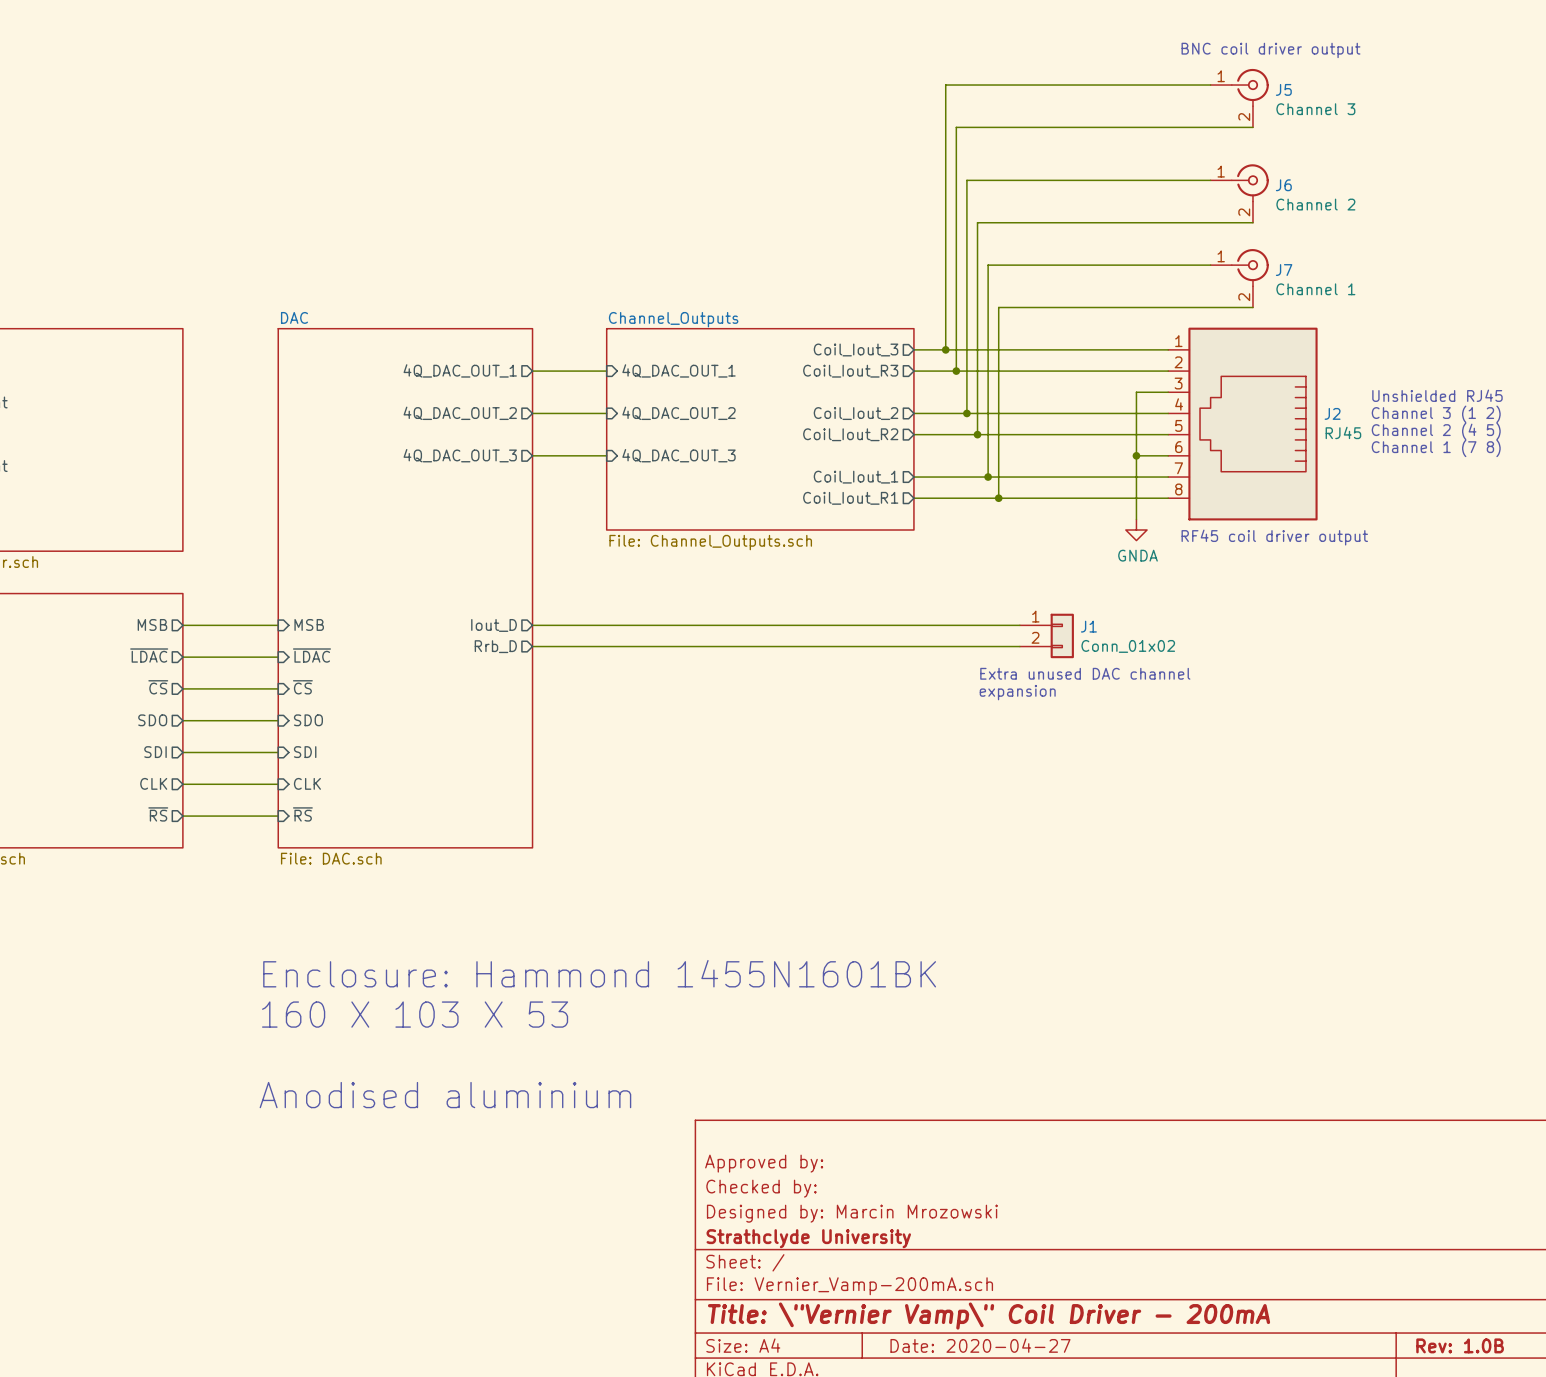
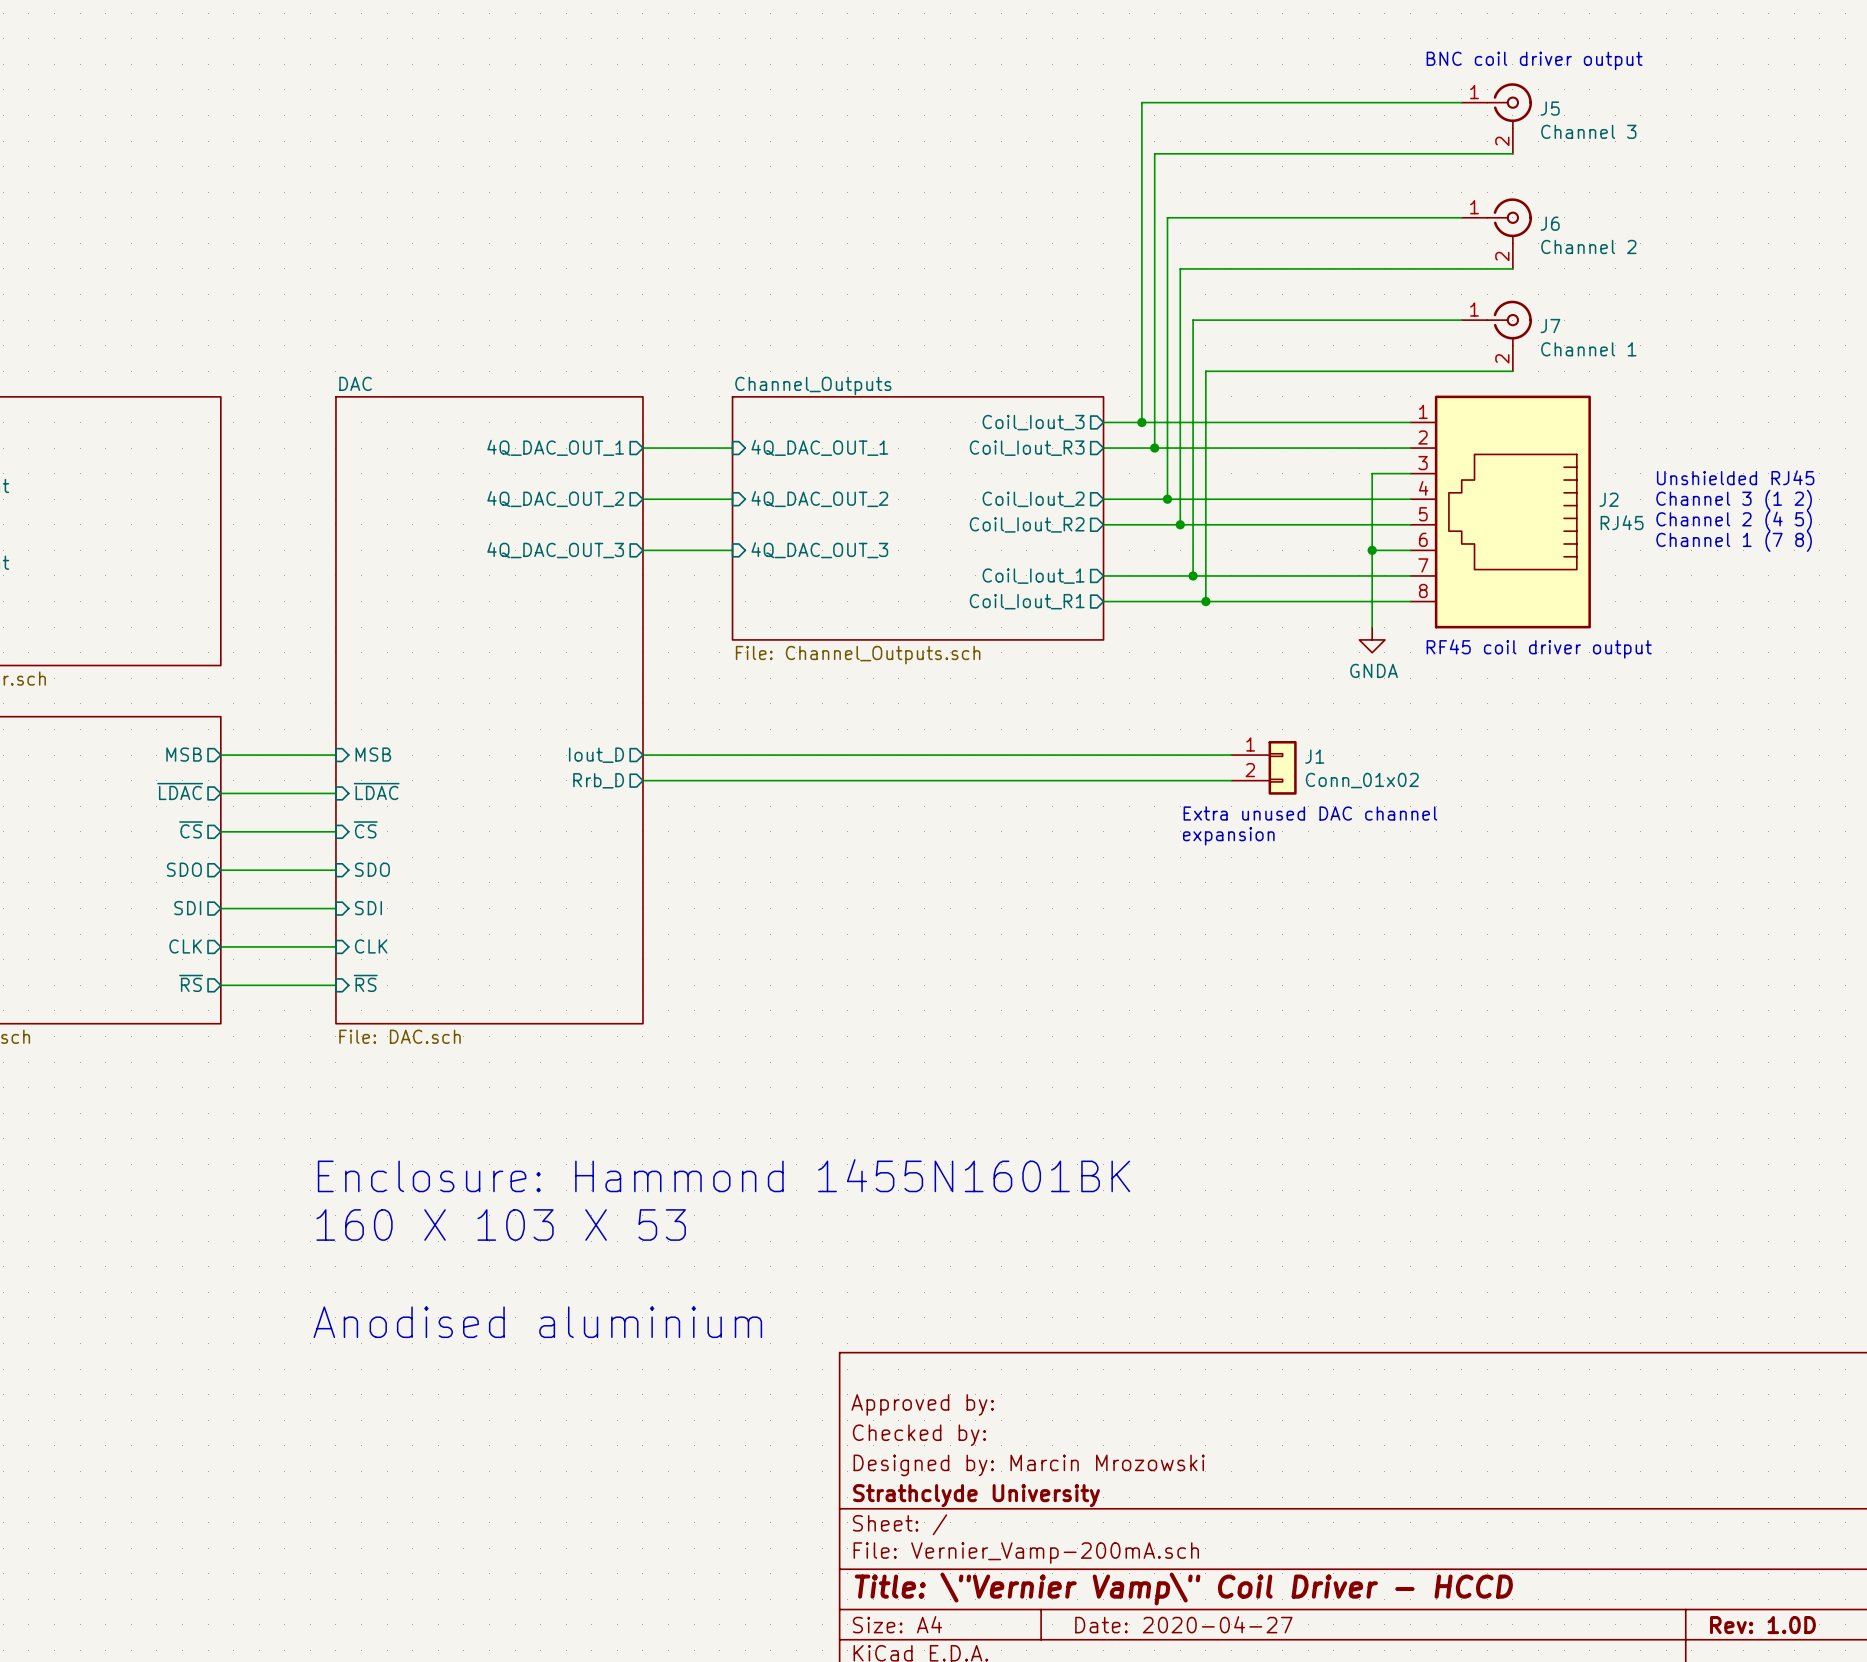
title block: Title: \"Vernier Vamp\" Coil Driver - 200mA (989, 1316) -> Title: \"Vernier Vamp\" Coil Driver - HCCD (1183, 1589)
title block: Rev: 1.0B (1460, 1345) -> Rev: 1.0D (1762, 1625)

